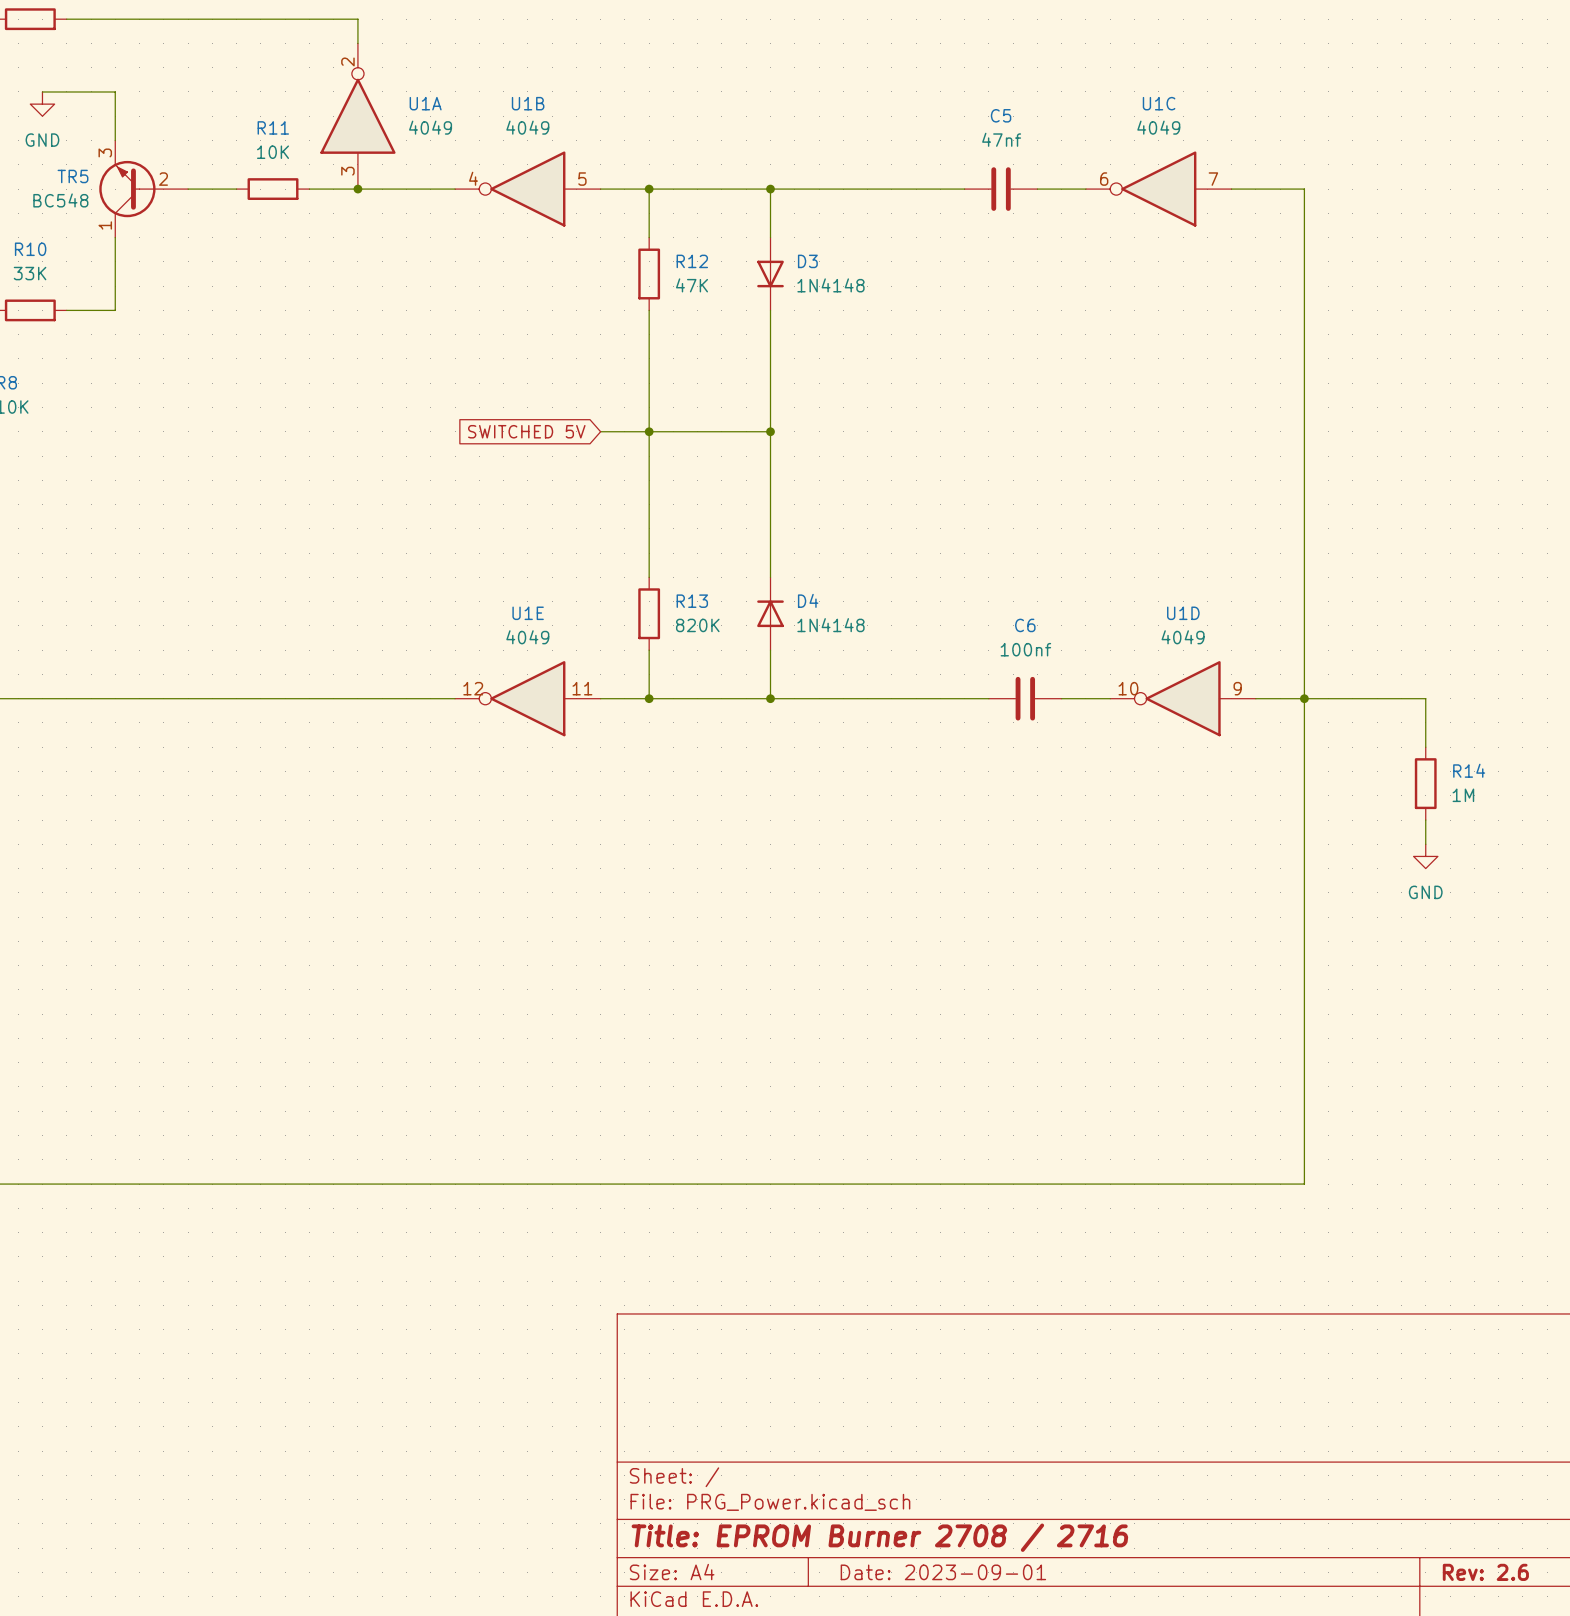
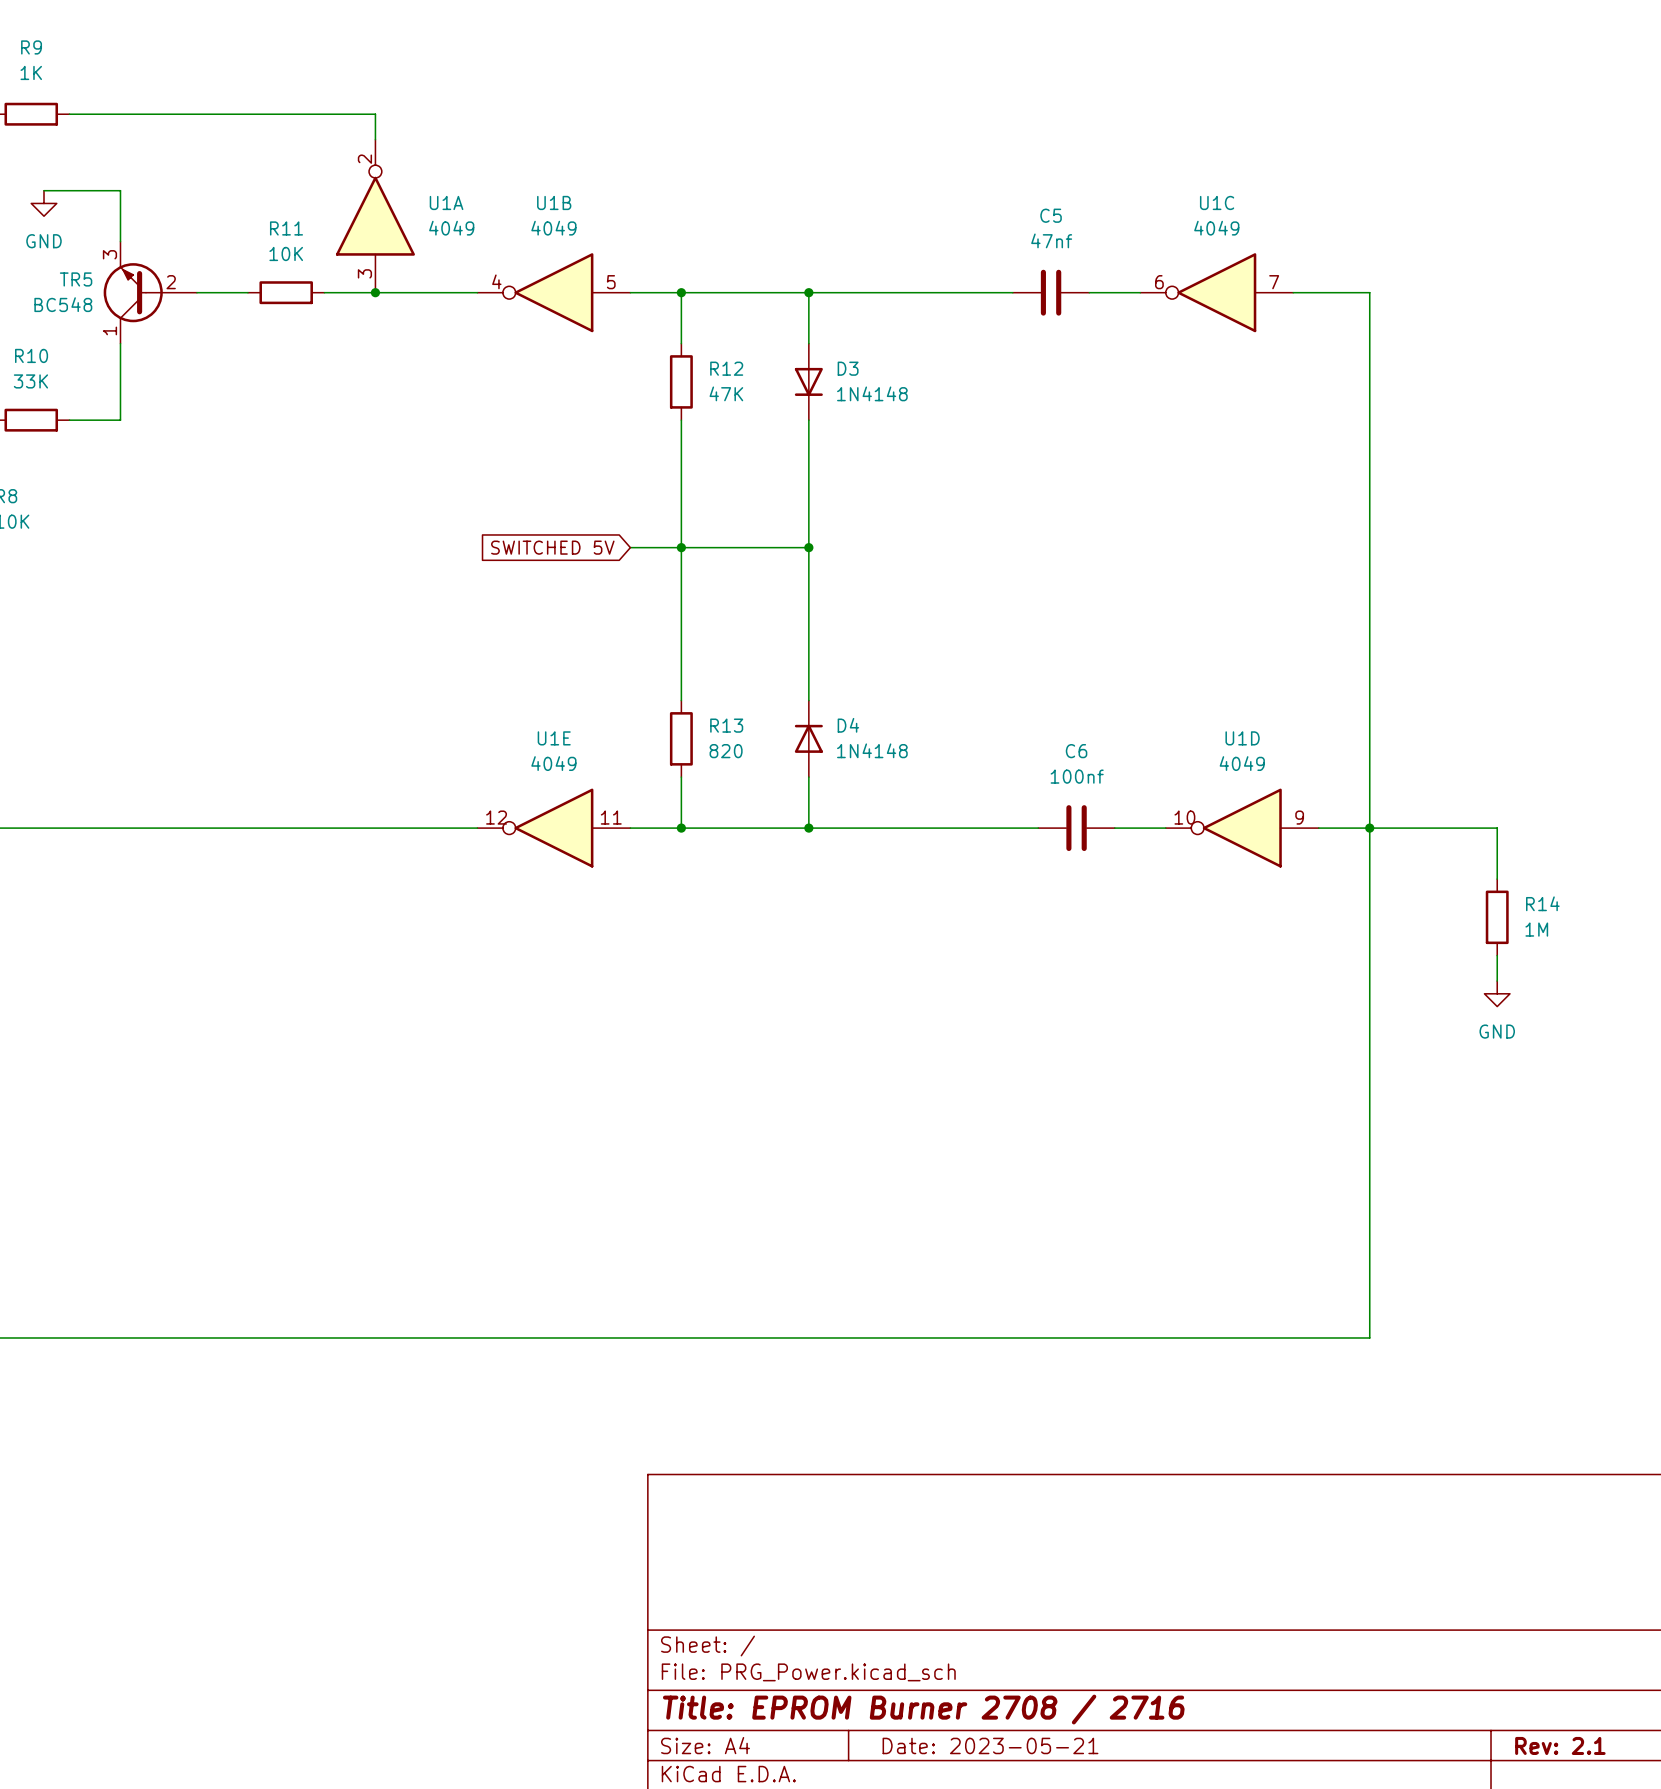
R13 value: 820K (697, 625) -> 820 (726, 751)
title block: Date: 2023-09-01 (943, 1572) -> Date: 2023-05-21 (990, 1745)
title block: Rev: 2.6 (1485, 1572) -> Rev: 2.1 (1560, 1745)

